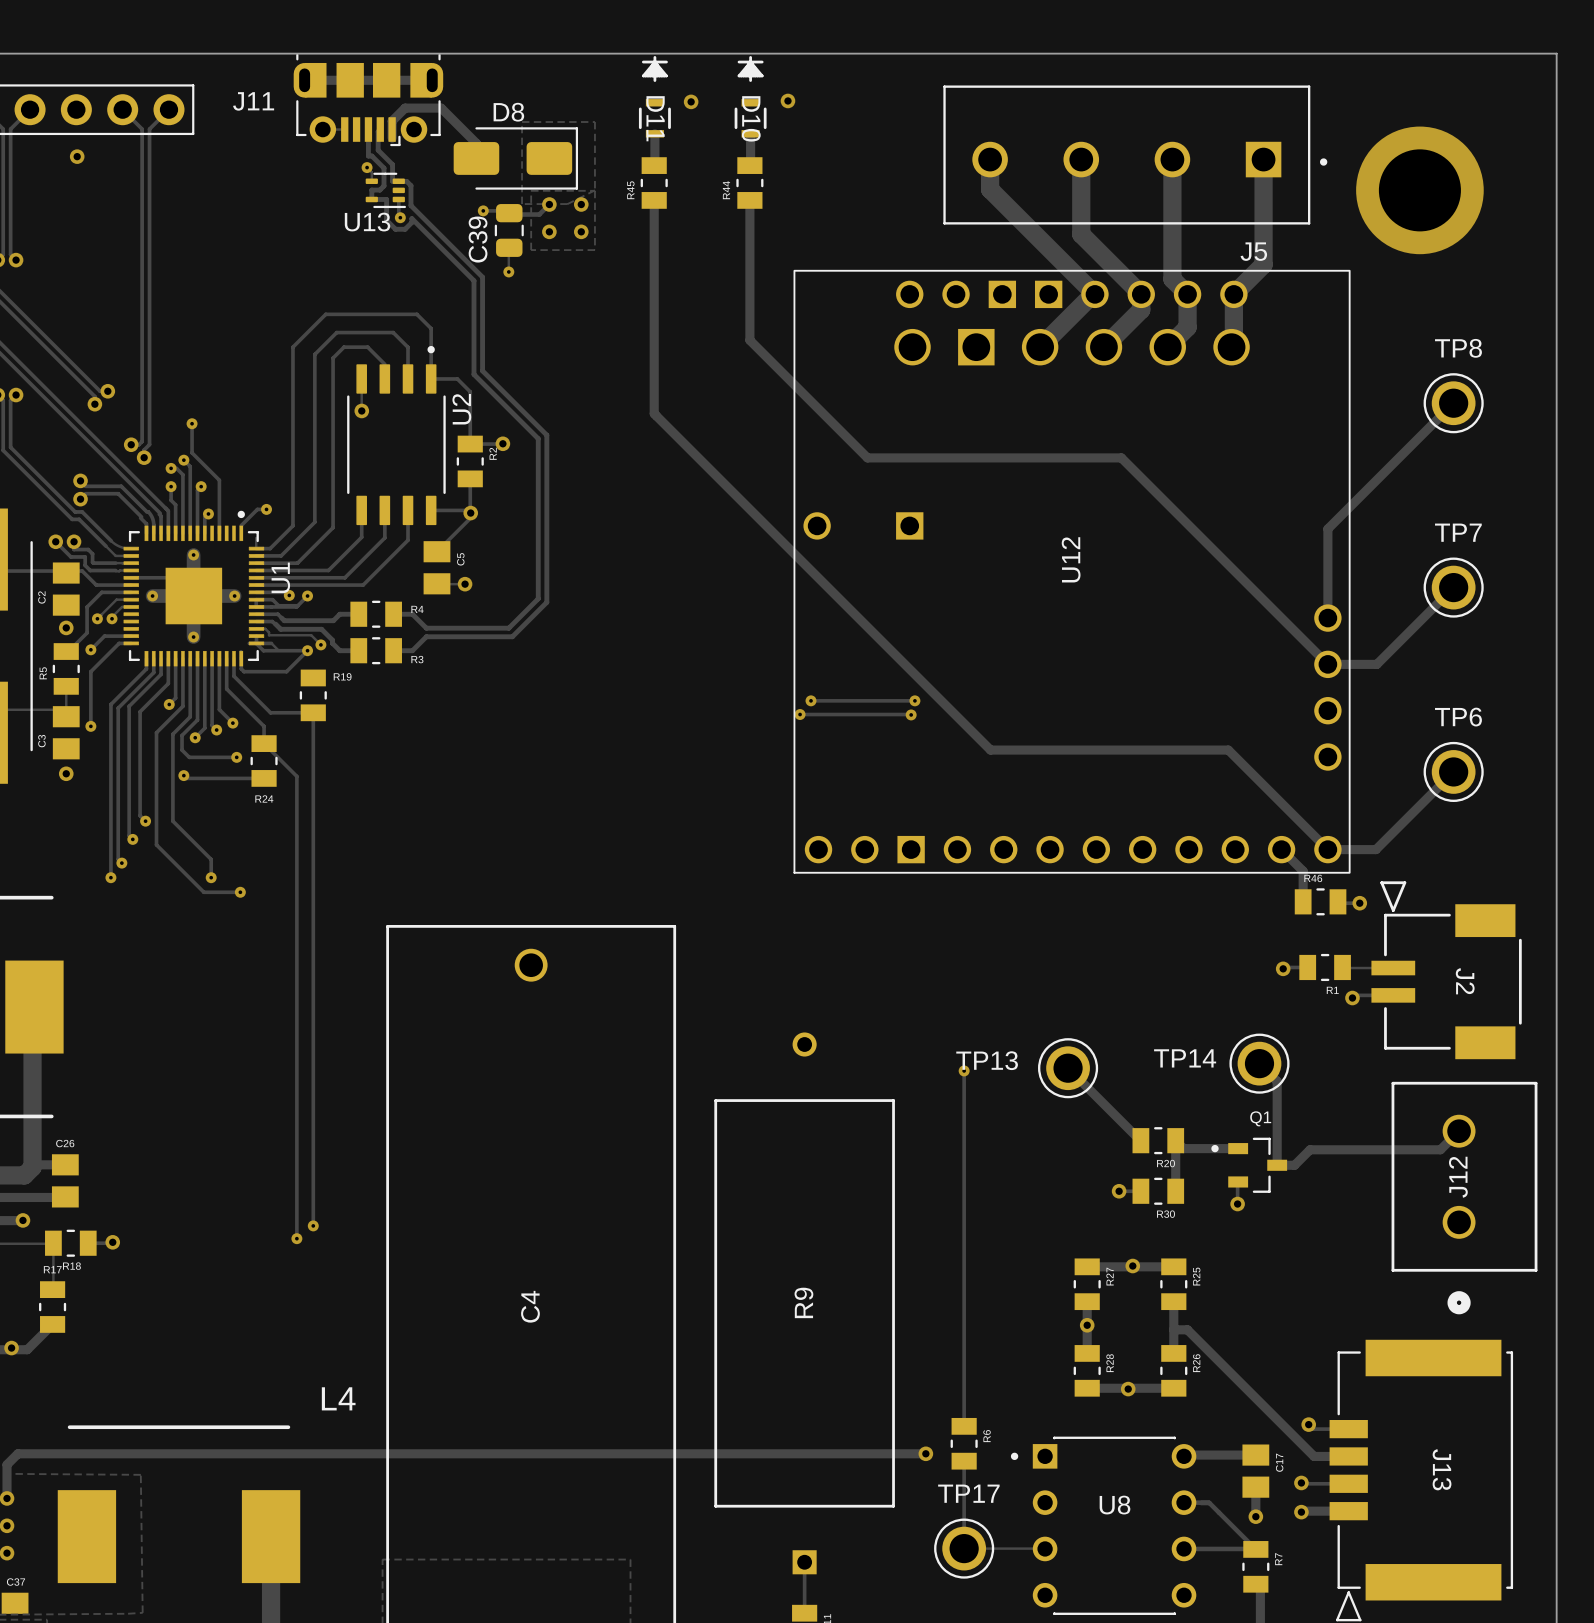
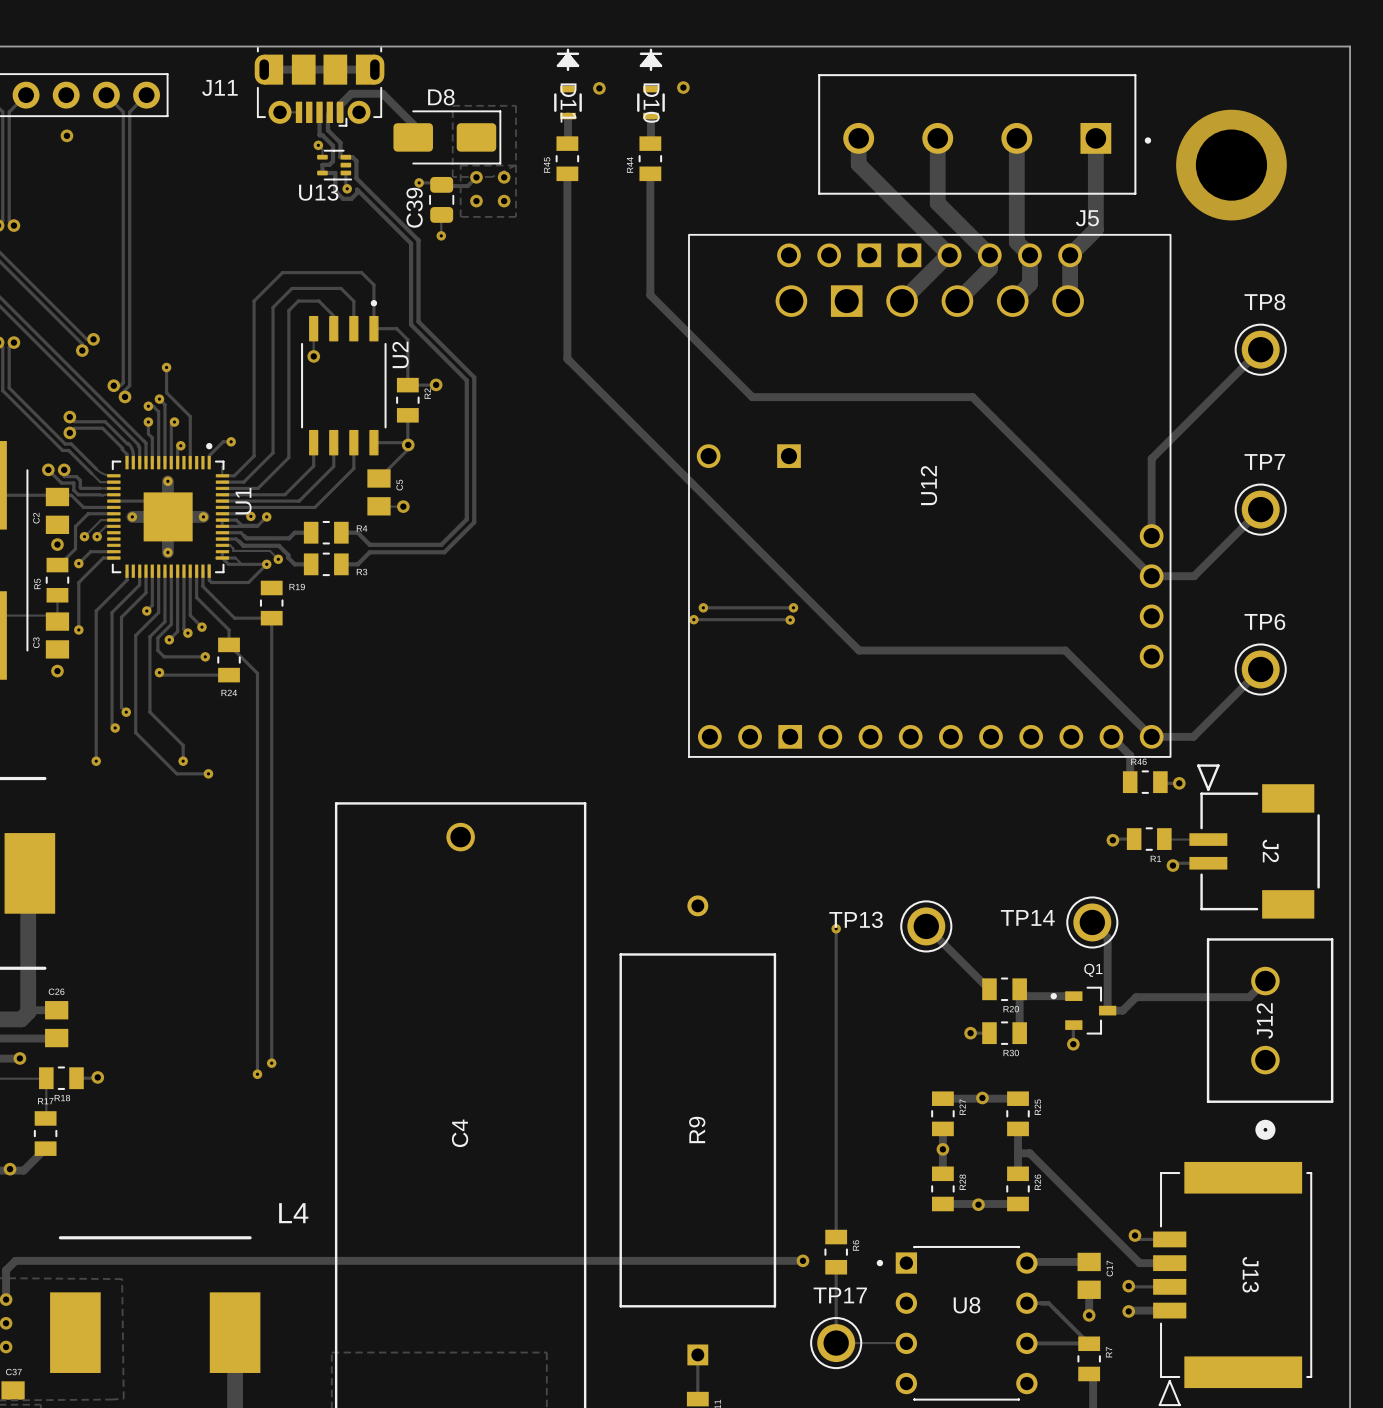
track: (153, 658) (153, 672) (118, 708) (118, 859) (121, 863) -> none
via: (121, 863) -> none

